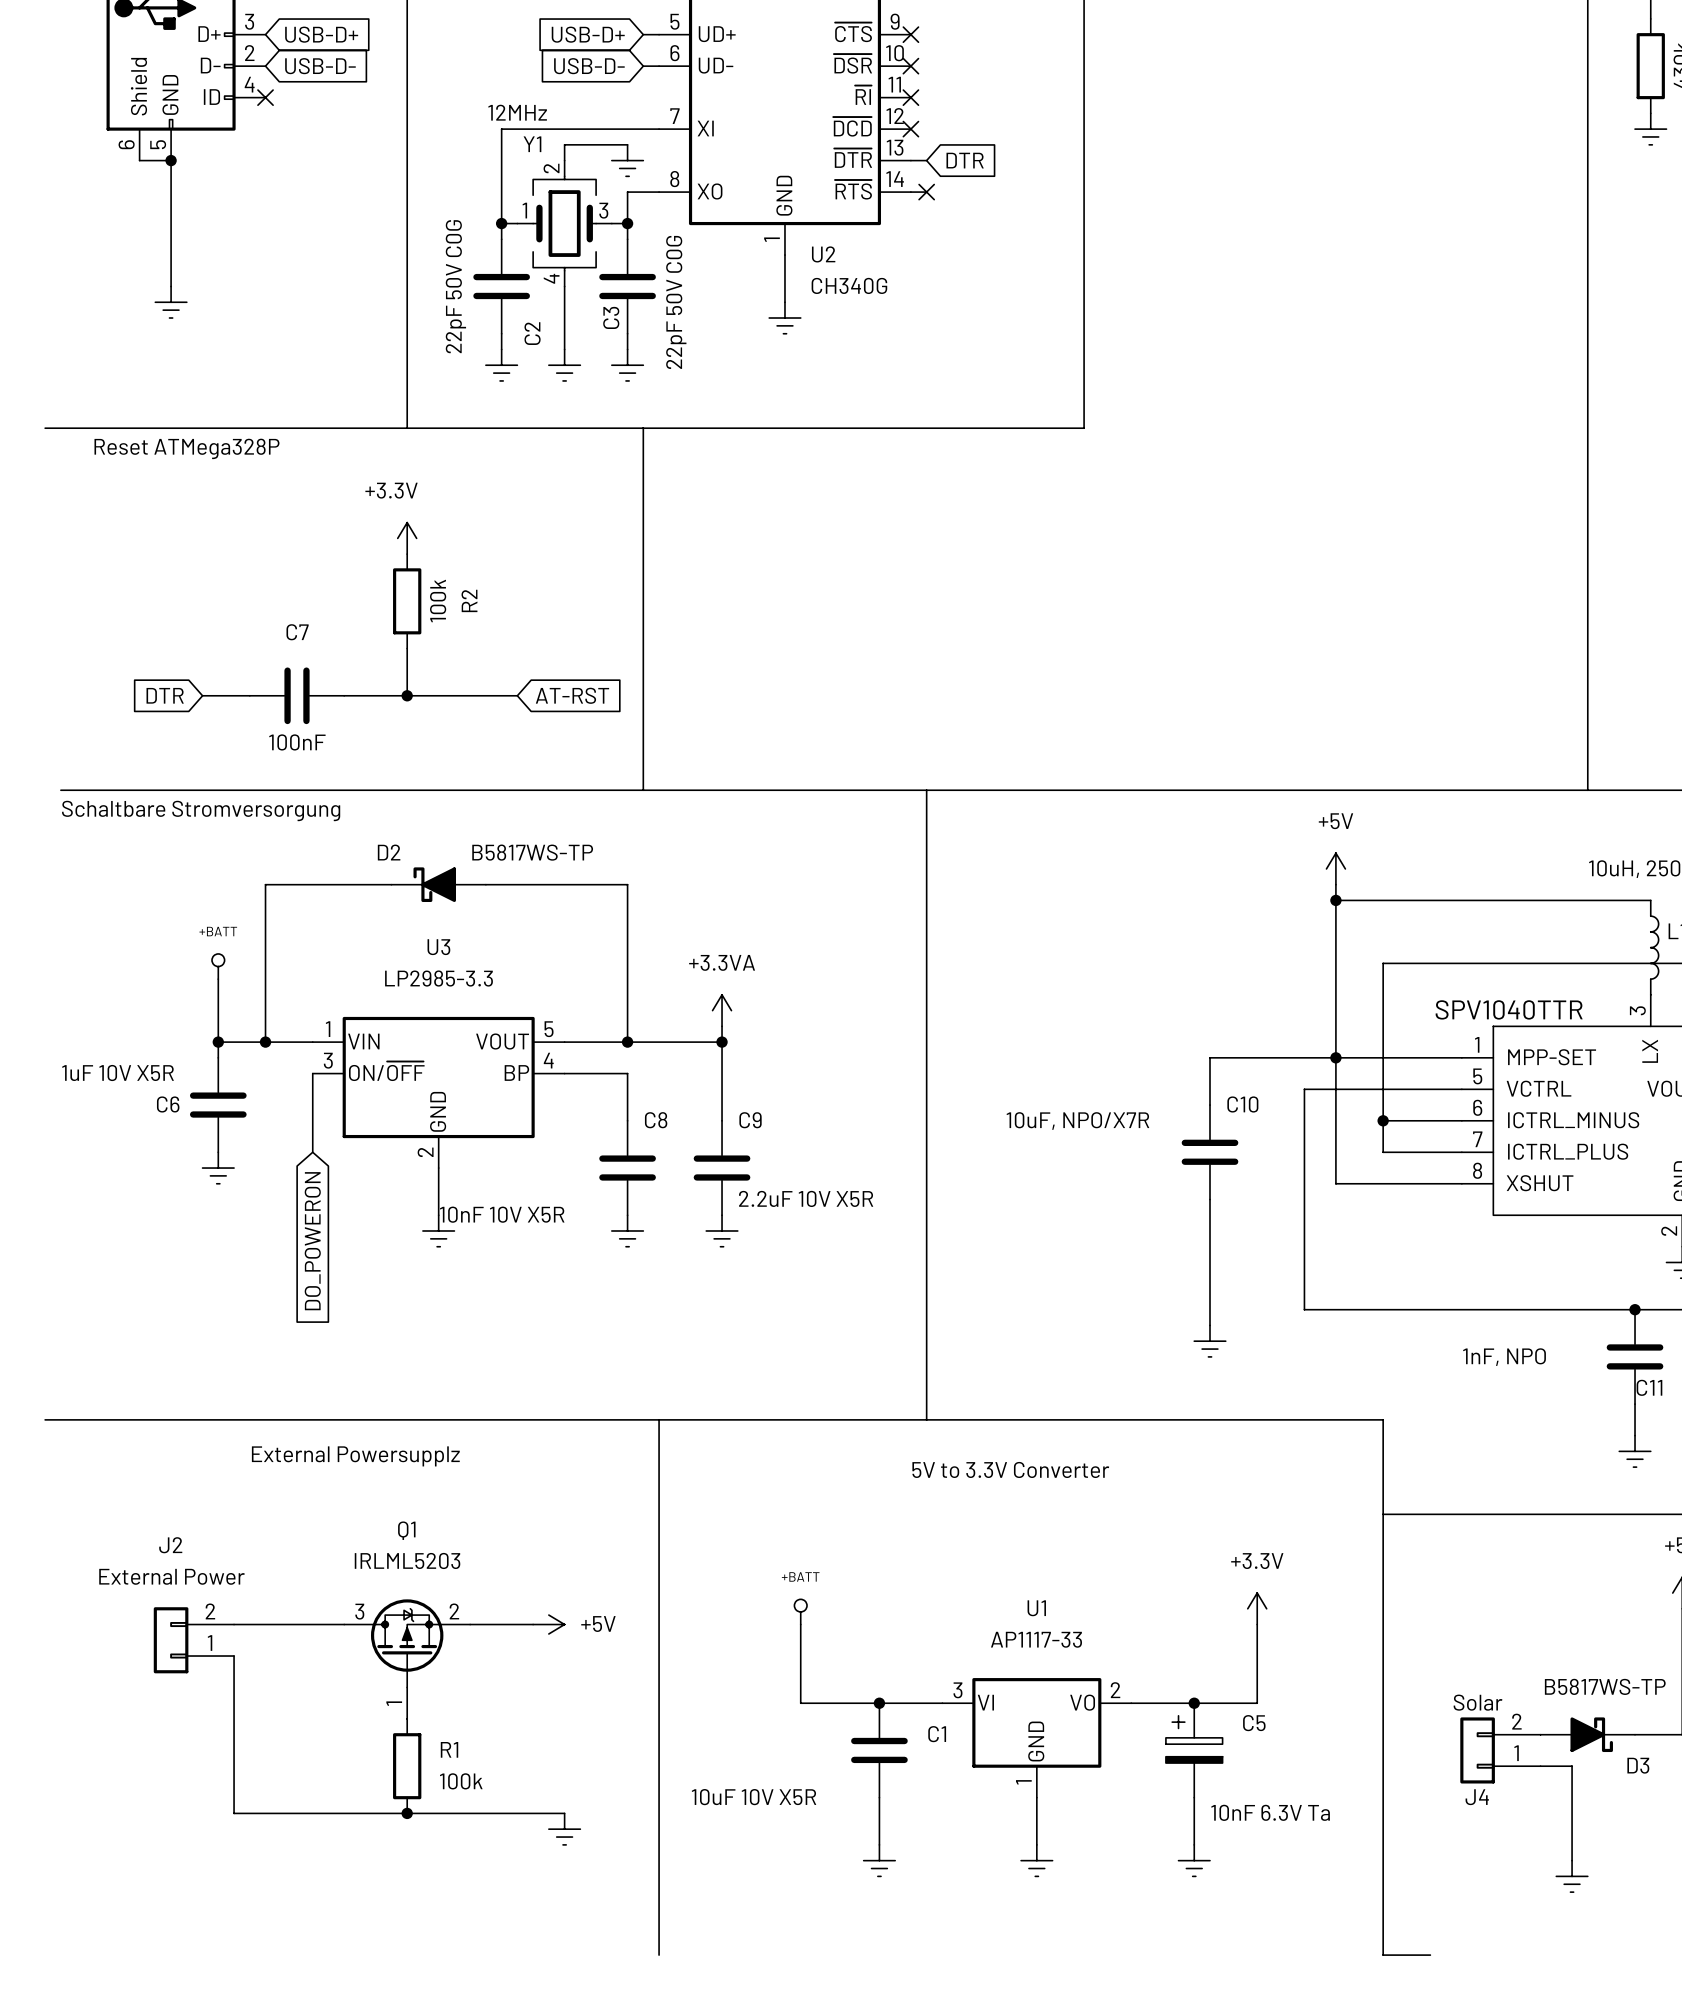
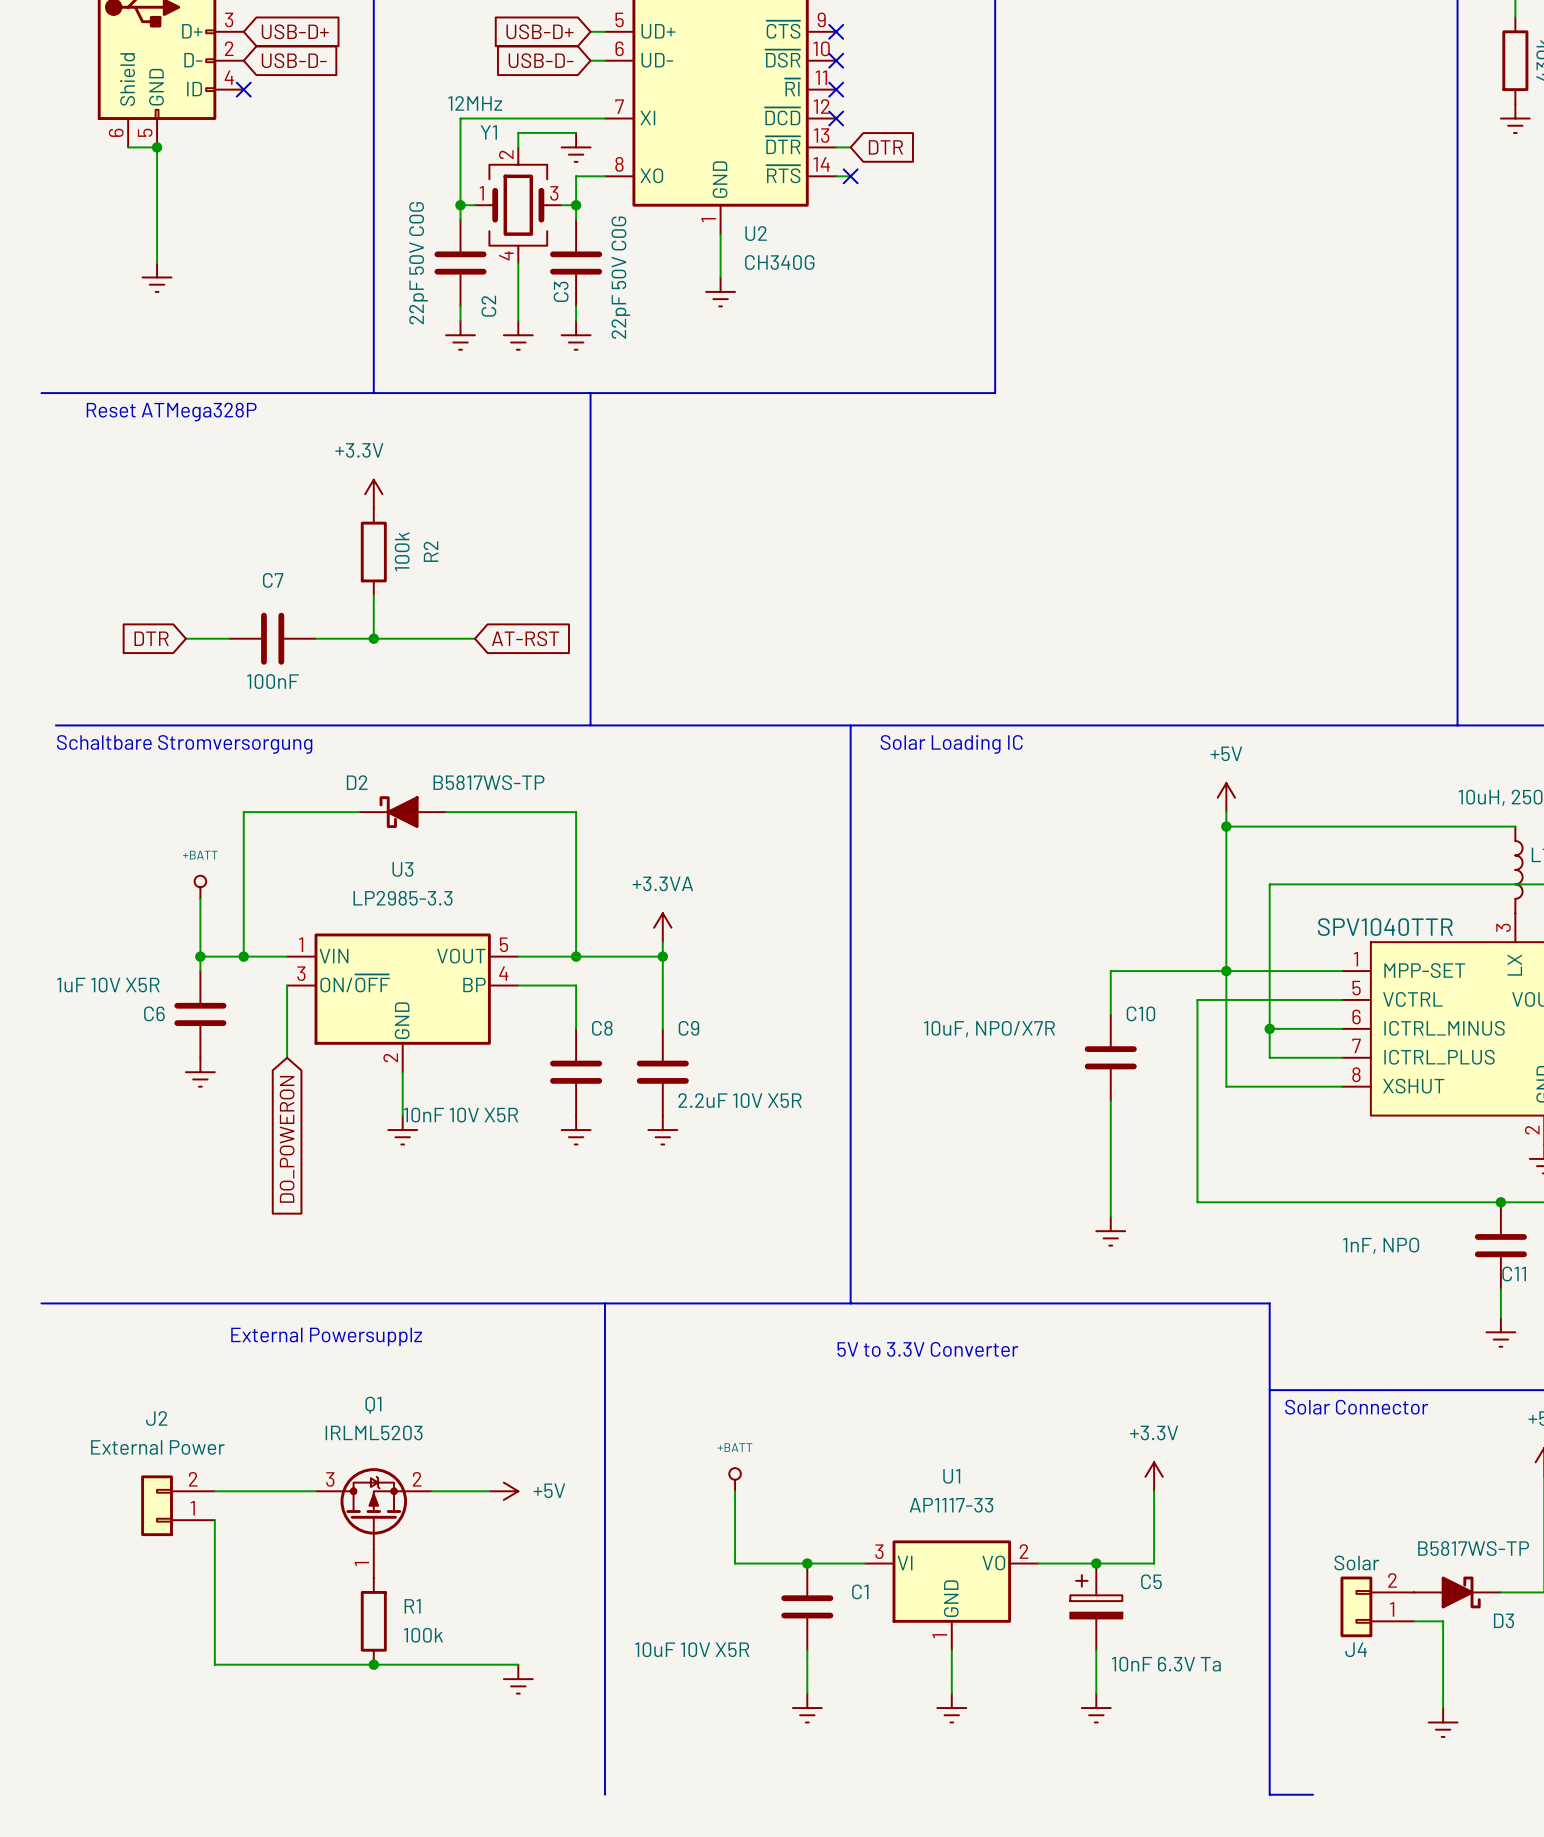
text: none -> Solar Loading IC (951, 744)
text: none -> Solar Connector (1356, 1407)

